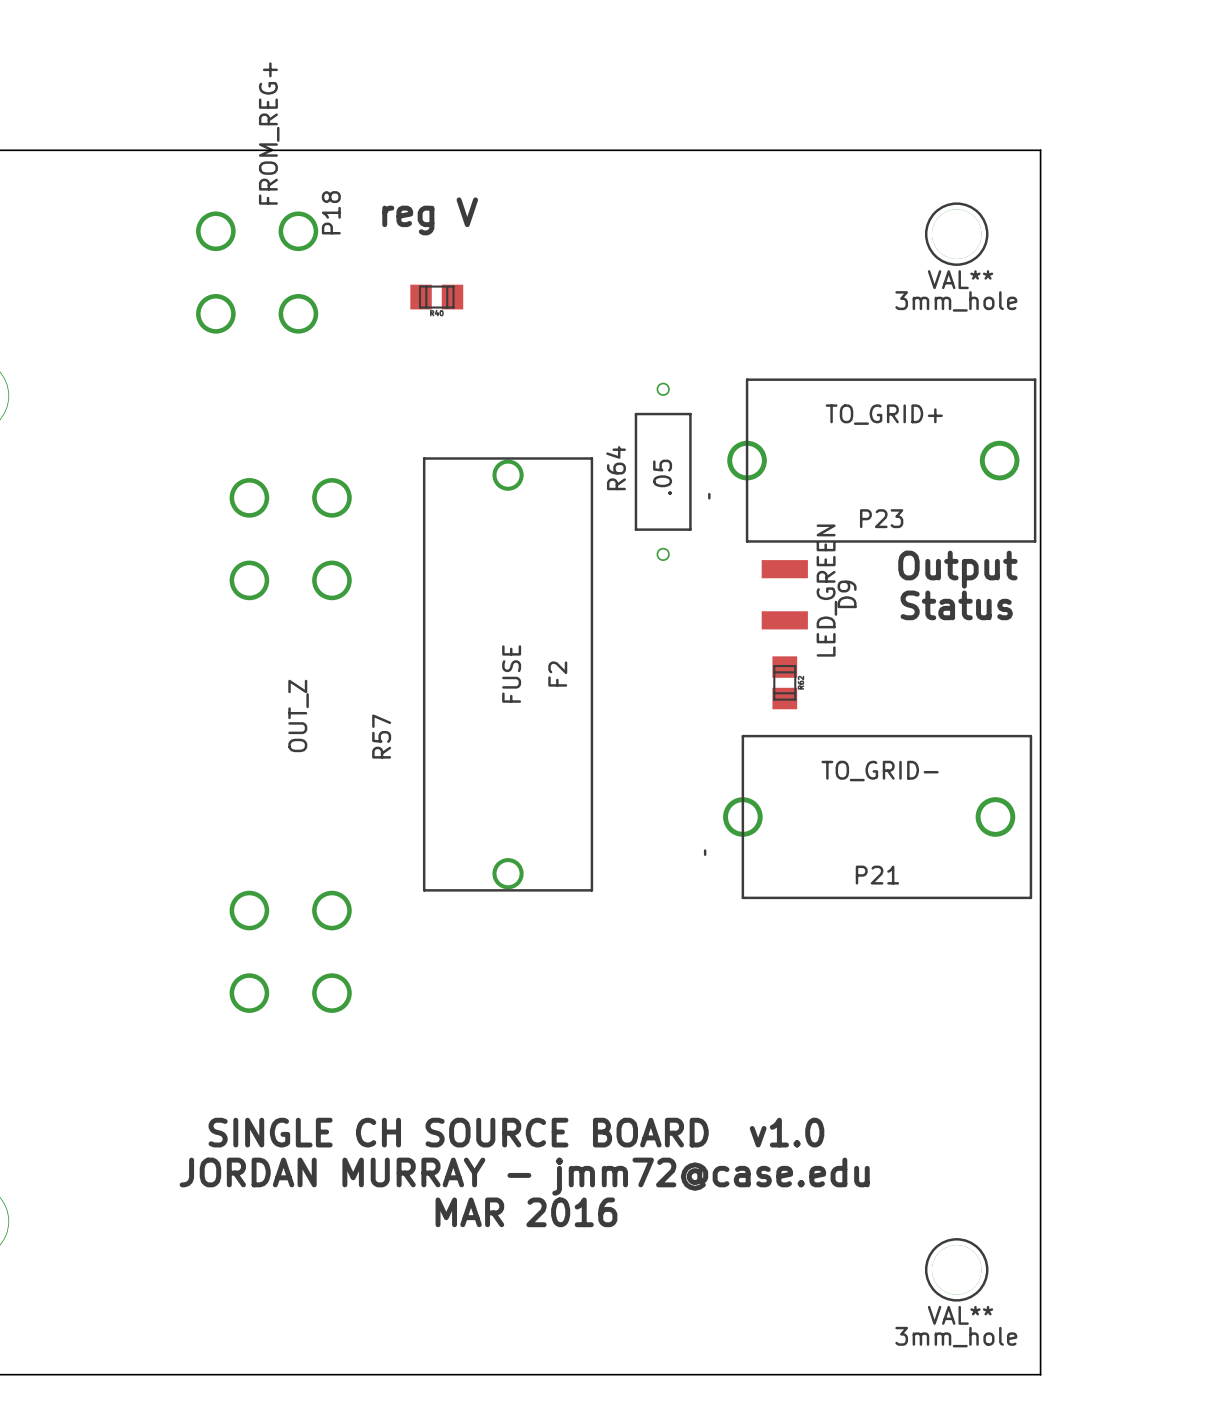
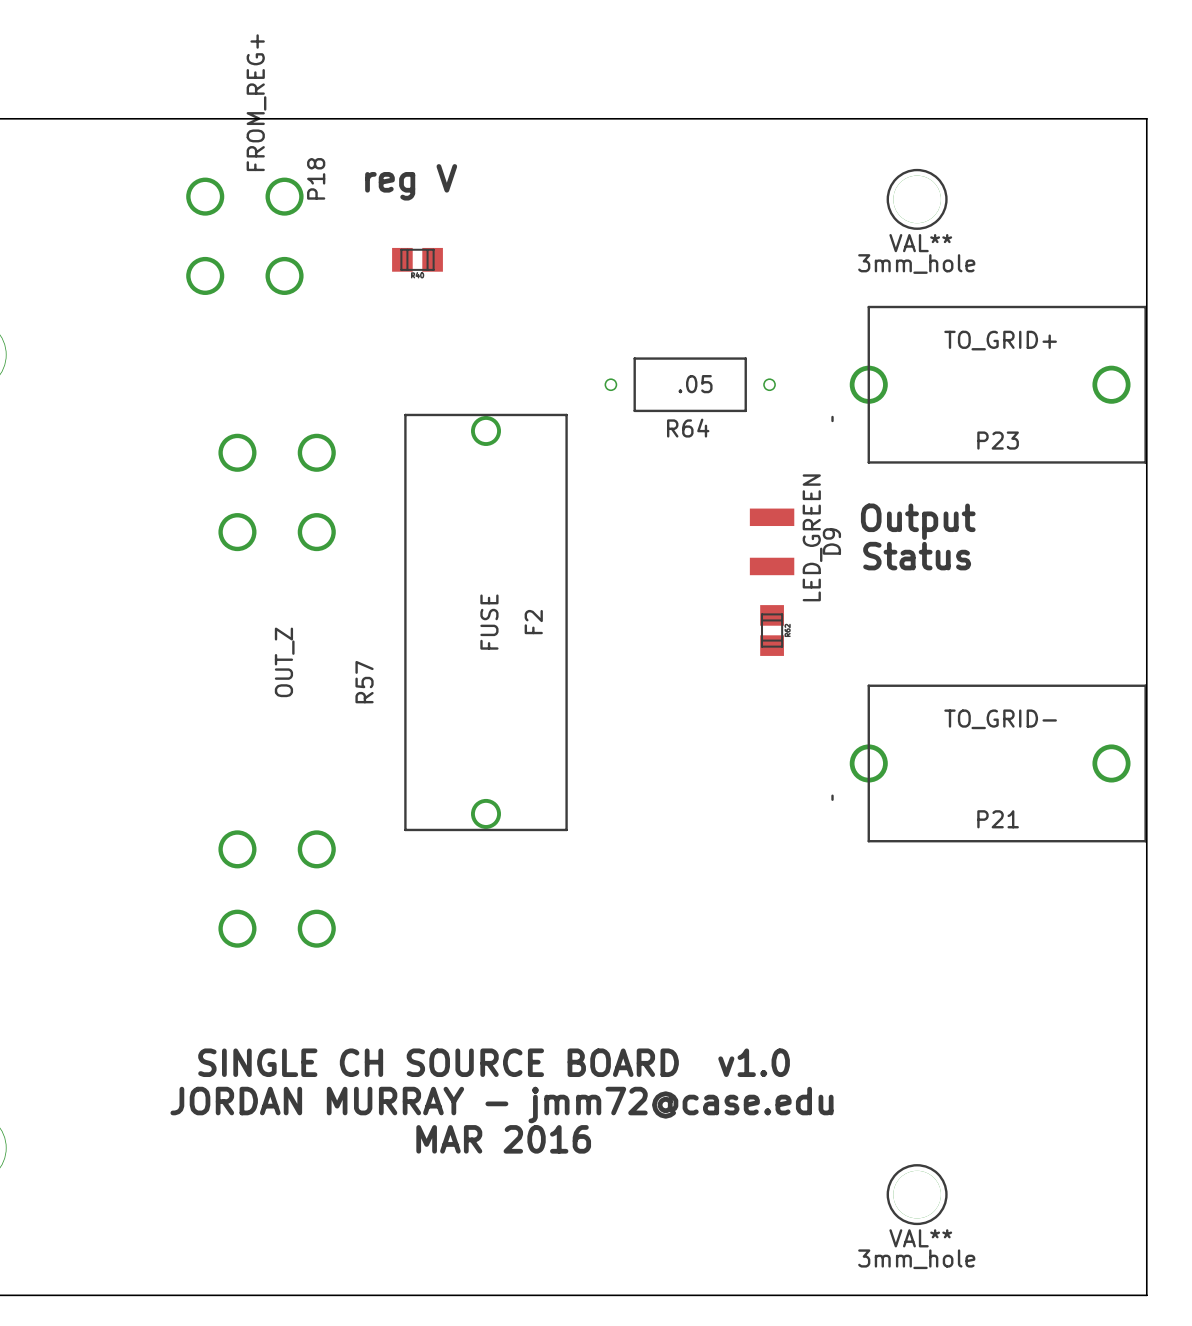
board edge: (1040, 150) (1040, 1374) -> (997, 118) (1146, 118) (1146, 1295) (997, 1295)
P23 position: (872, 460) -> (989, 384)
R64 name position: R64 (616, 468) -> R64 (688, 428)
R64 rotation: 0° (663, 471) -> 90° clockwise (690, 384)
D9 position: (784, 594) -> (772, 541)
part position: (784, 682) -> (772, 630)
P21 position: (868, 816) -> (989, 763)

